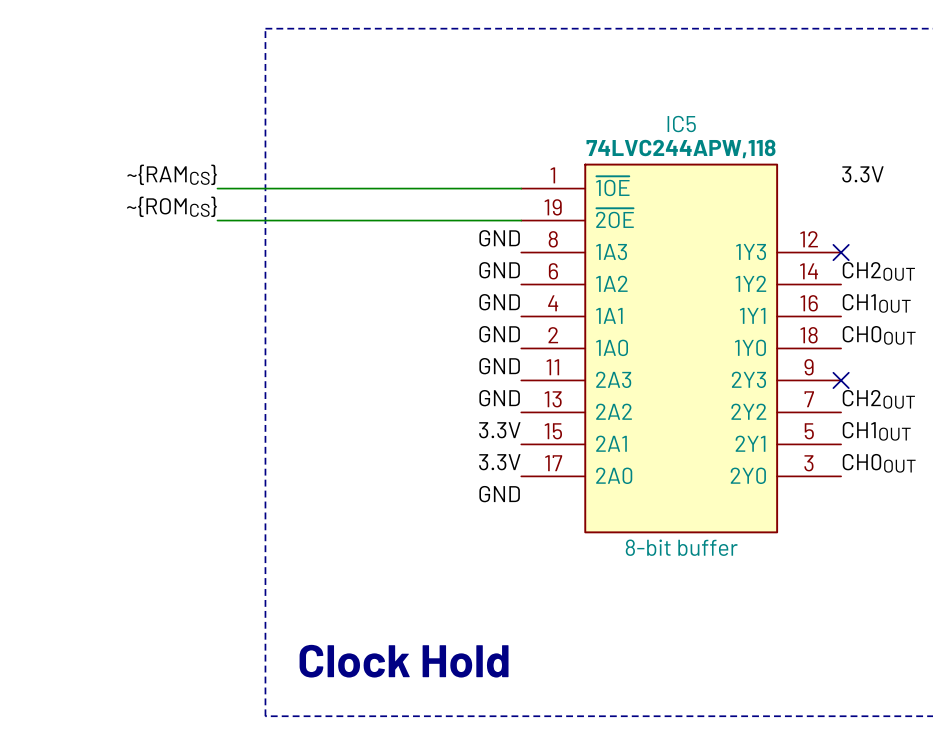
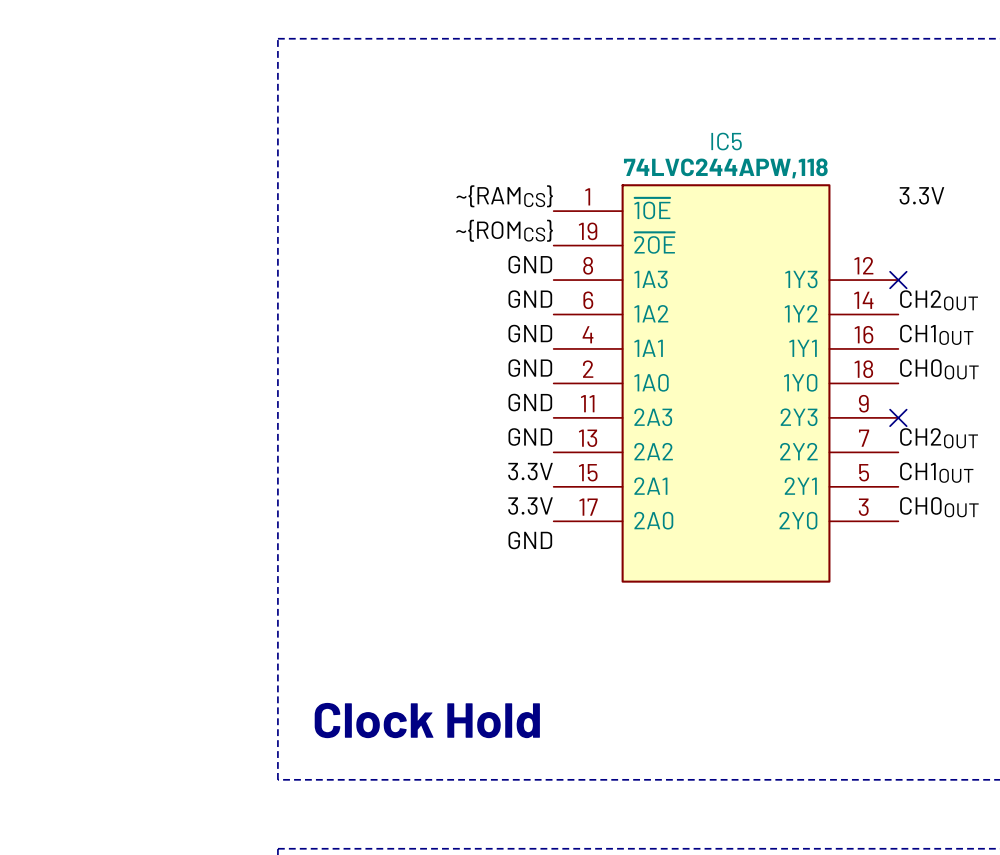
label position: ~{RAMCS} (171, 174) -> ~{RAMCS} (504, 196)
wire: (217, 188) (521, 188) -> none
label position: ~{ROMCS} (171, 206) -> ~{ROMCS} (504, 230)
wire: (217, 220) (521, 220) -> none
IC5 text: 8-bit buffer (681, 547) -> none

